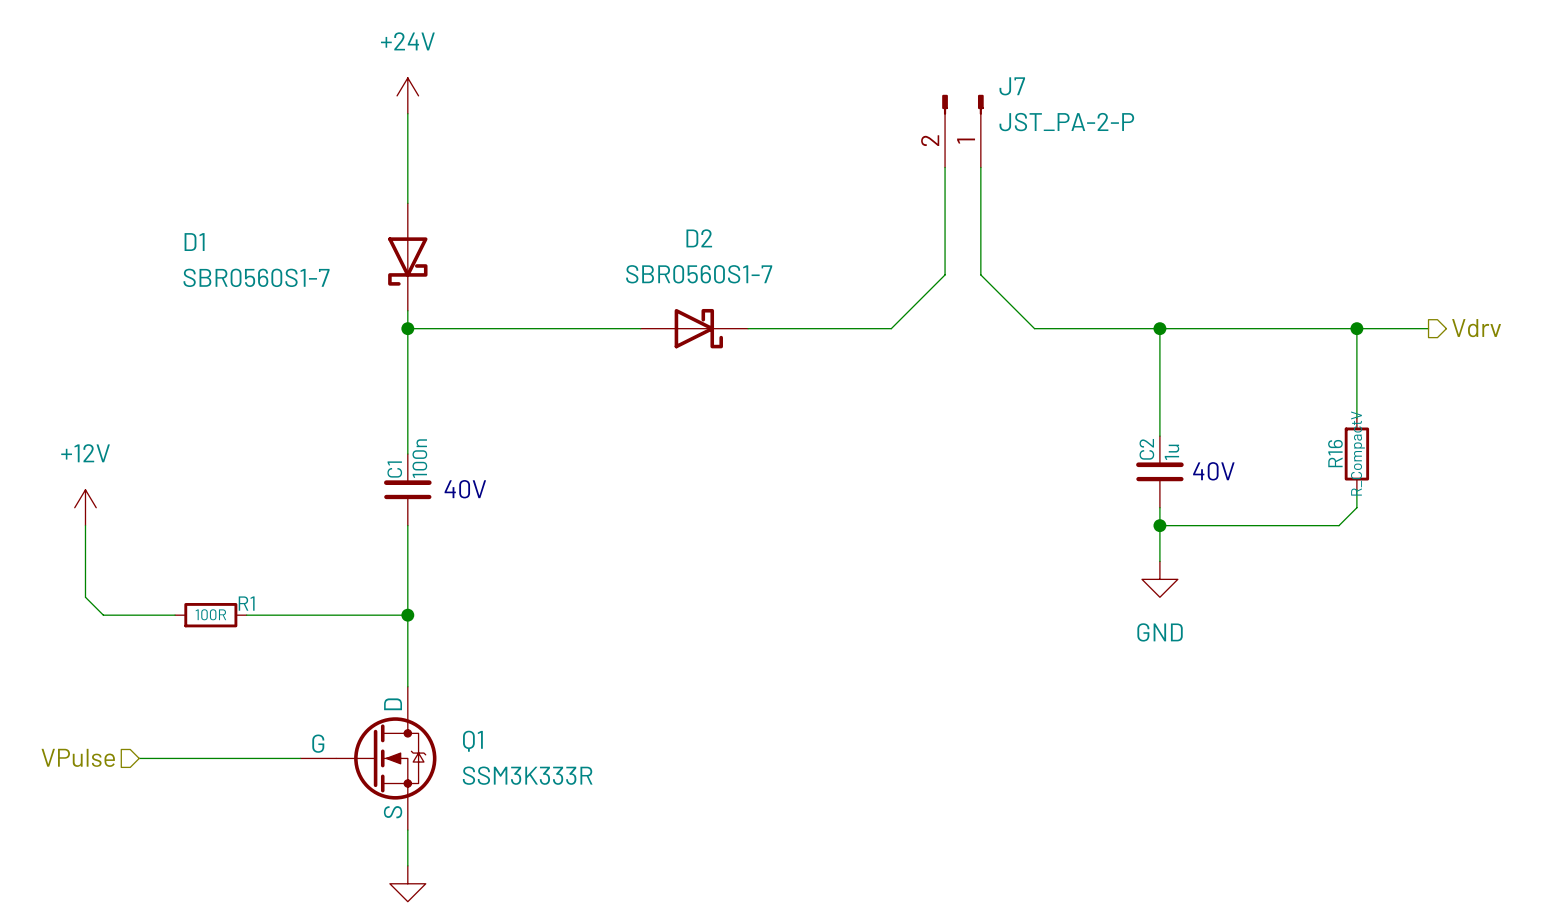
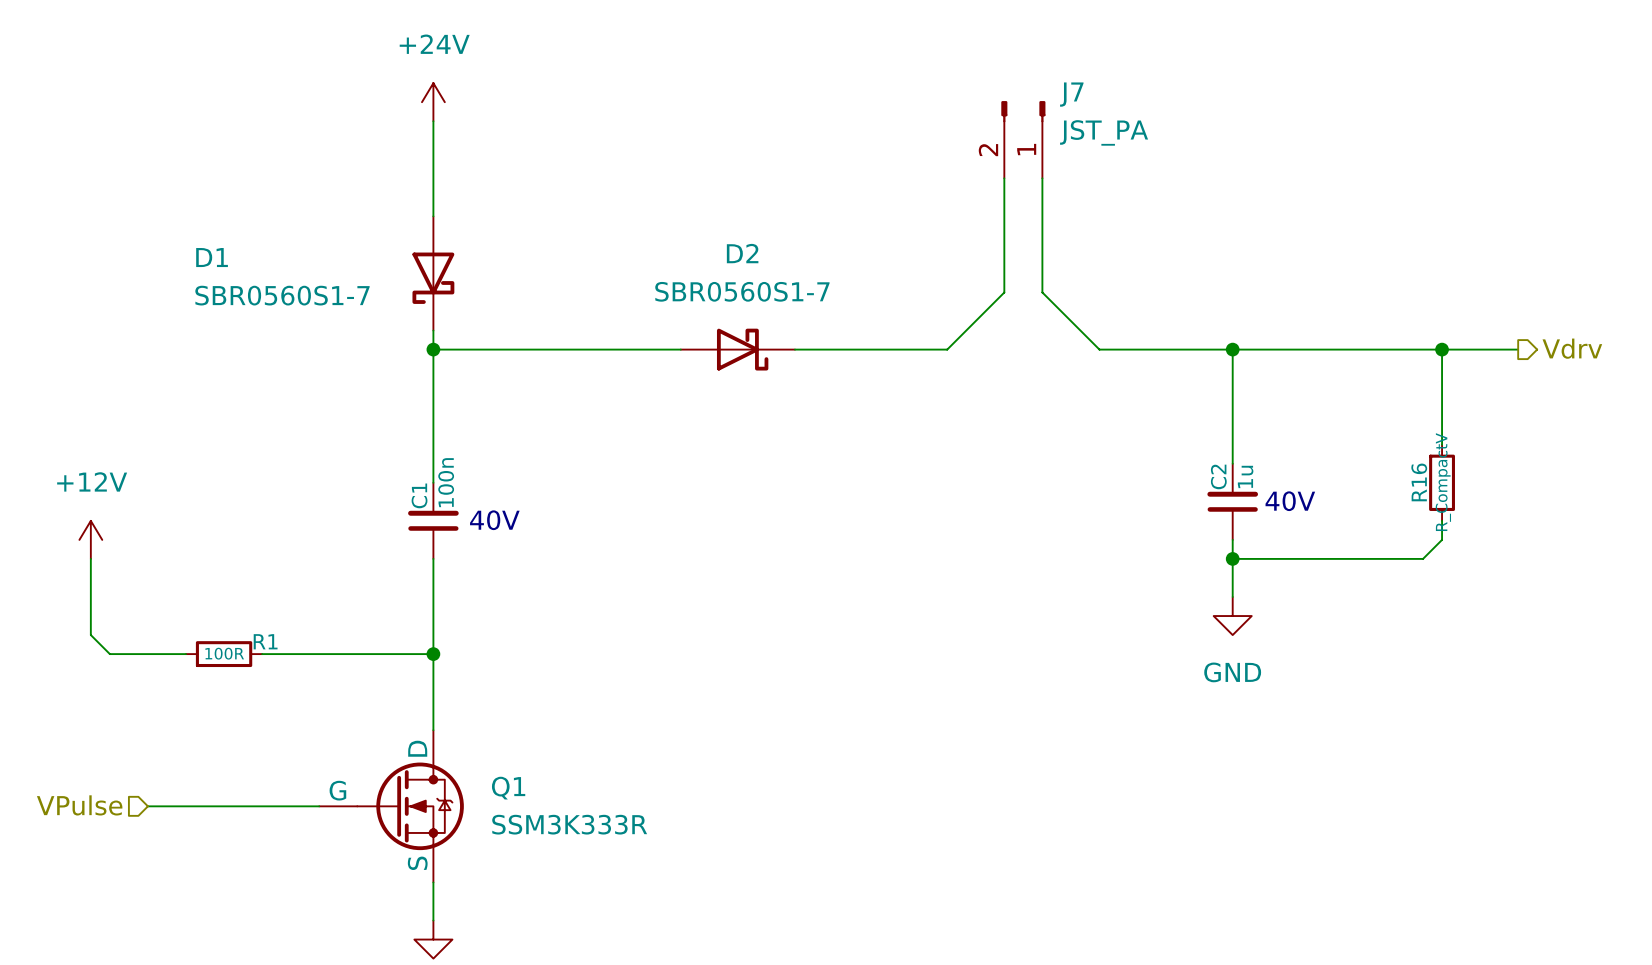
J7 value: JST_PA-2-P (1066, 122) -> JST_PA (1104, 132)

